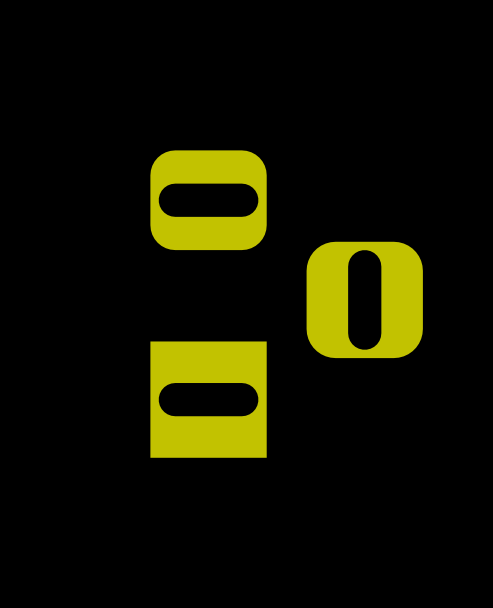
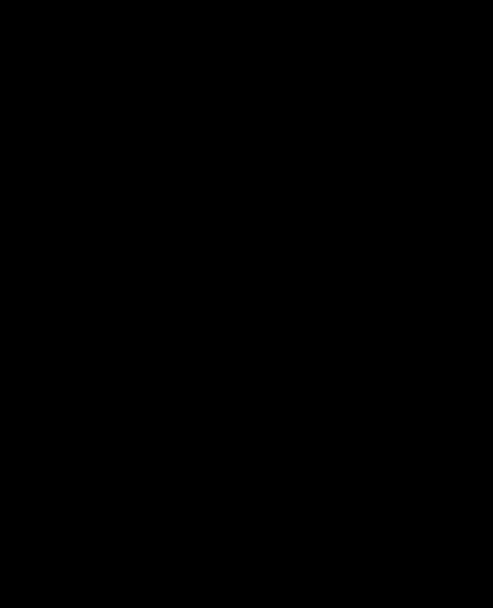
part: (286, 304) -> none

